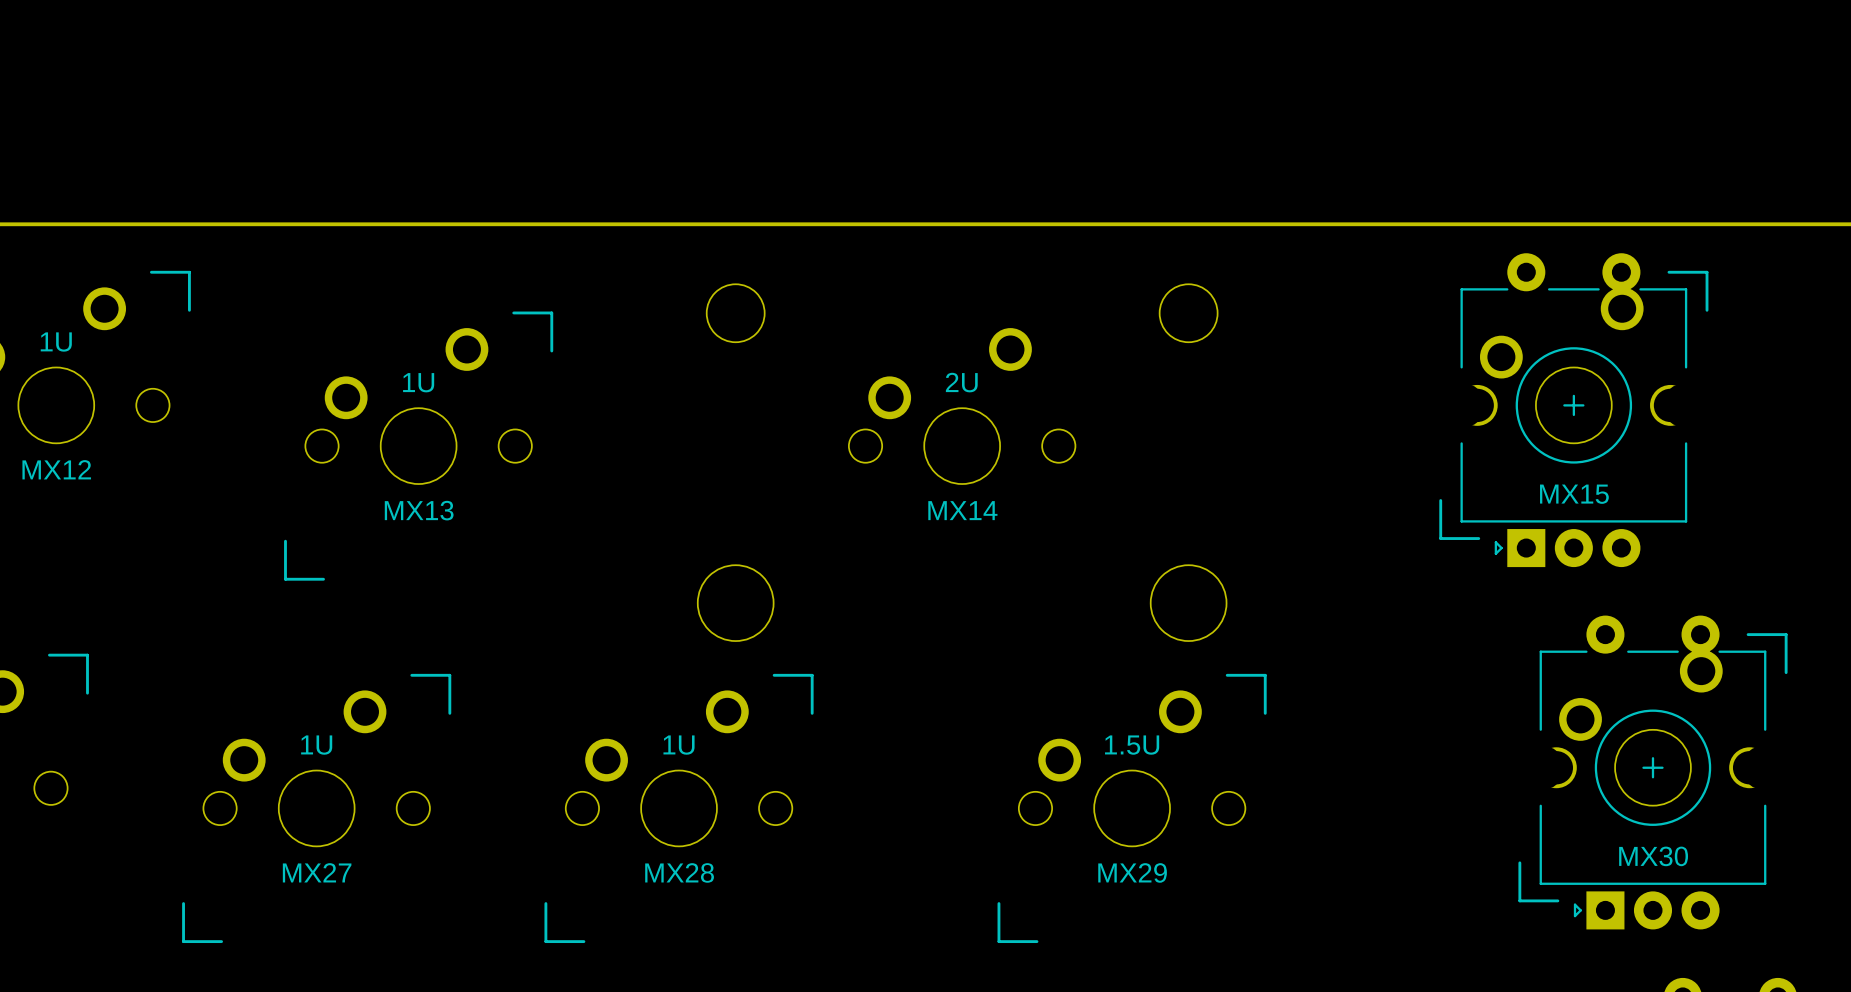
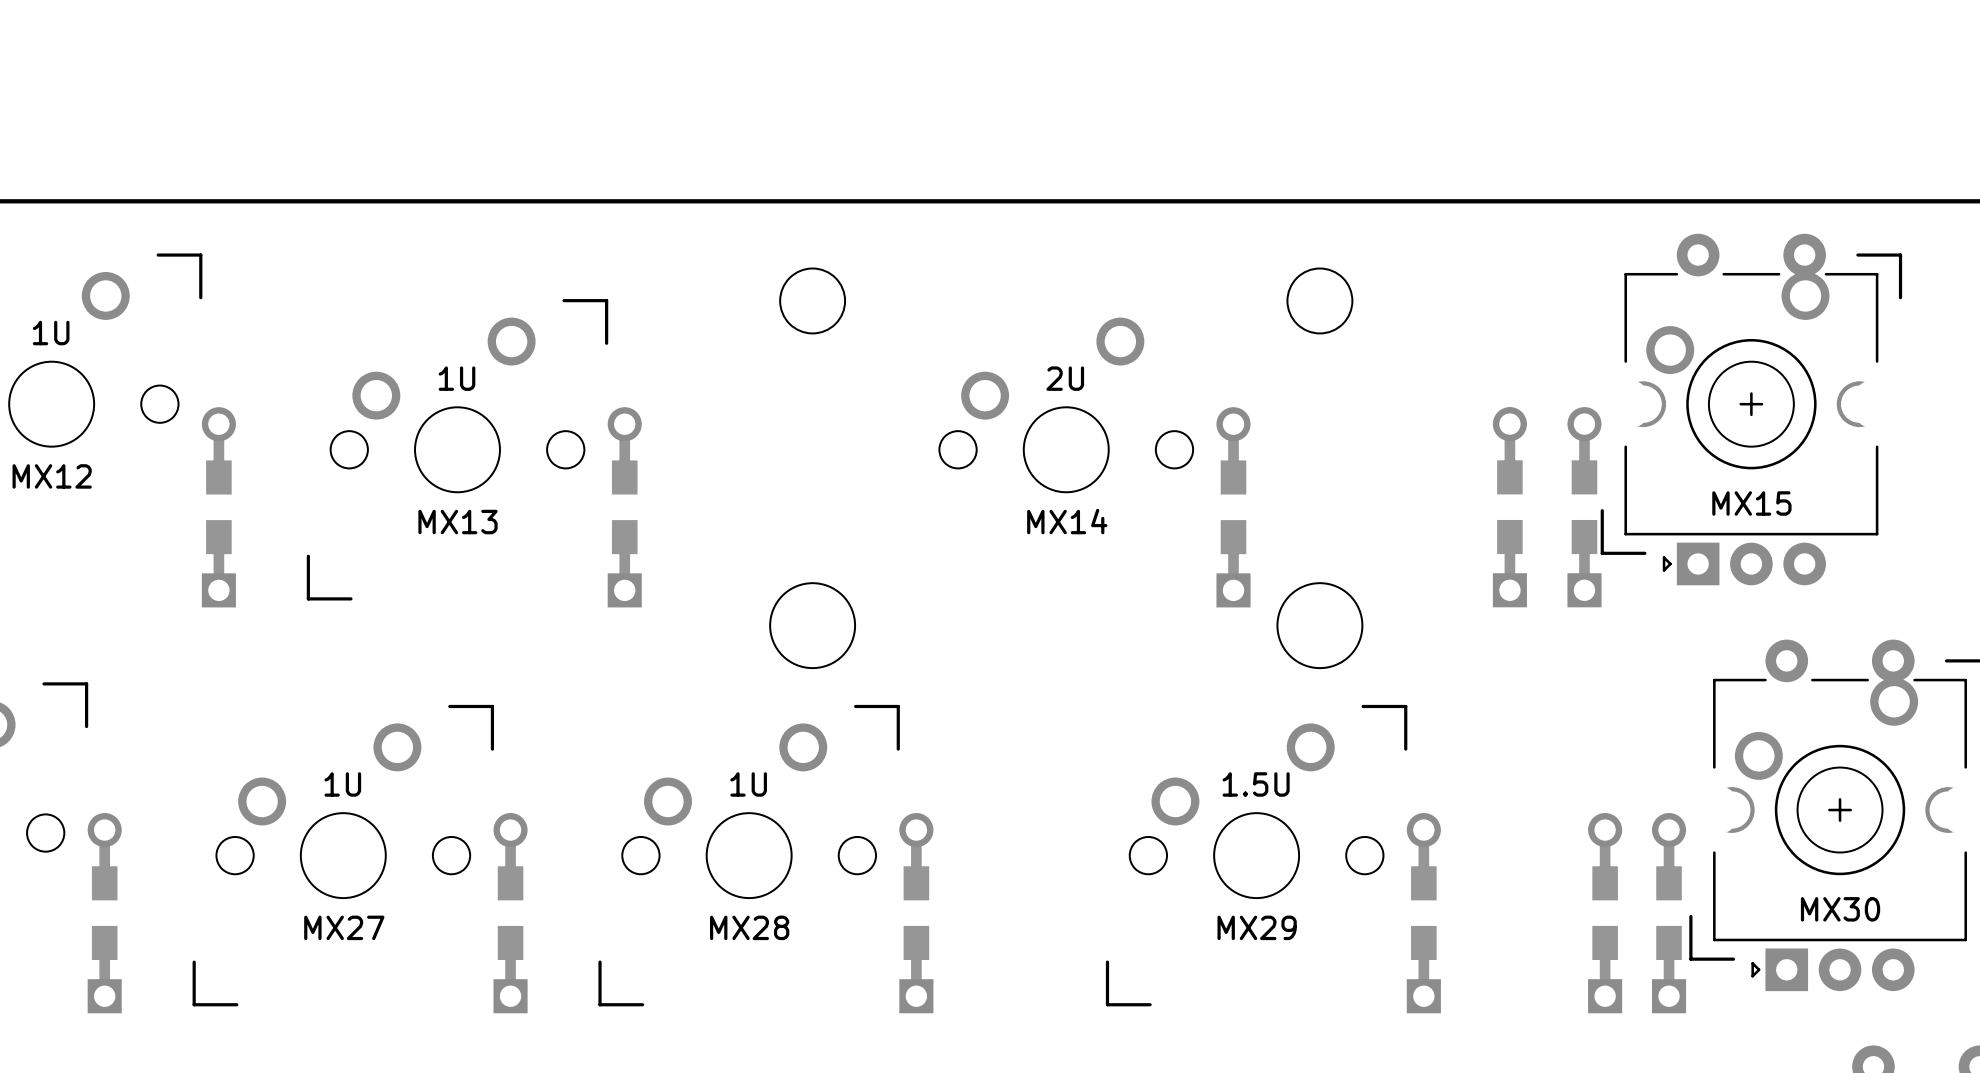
part: none -> (218, 507)
part: none -> (624, 507)
part: none -> (1233, 507)
part: none -> (1509, 507)
part: none -> (1584, 507)
part: none -> (104, 913)
part: none -> (510, 913)
part: none -> (916, 913)
part: none -> (1423, 913)
part: none -> (1605, 913)
part: none -> (1669, 913)

